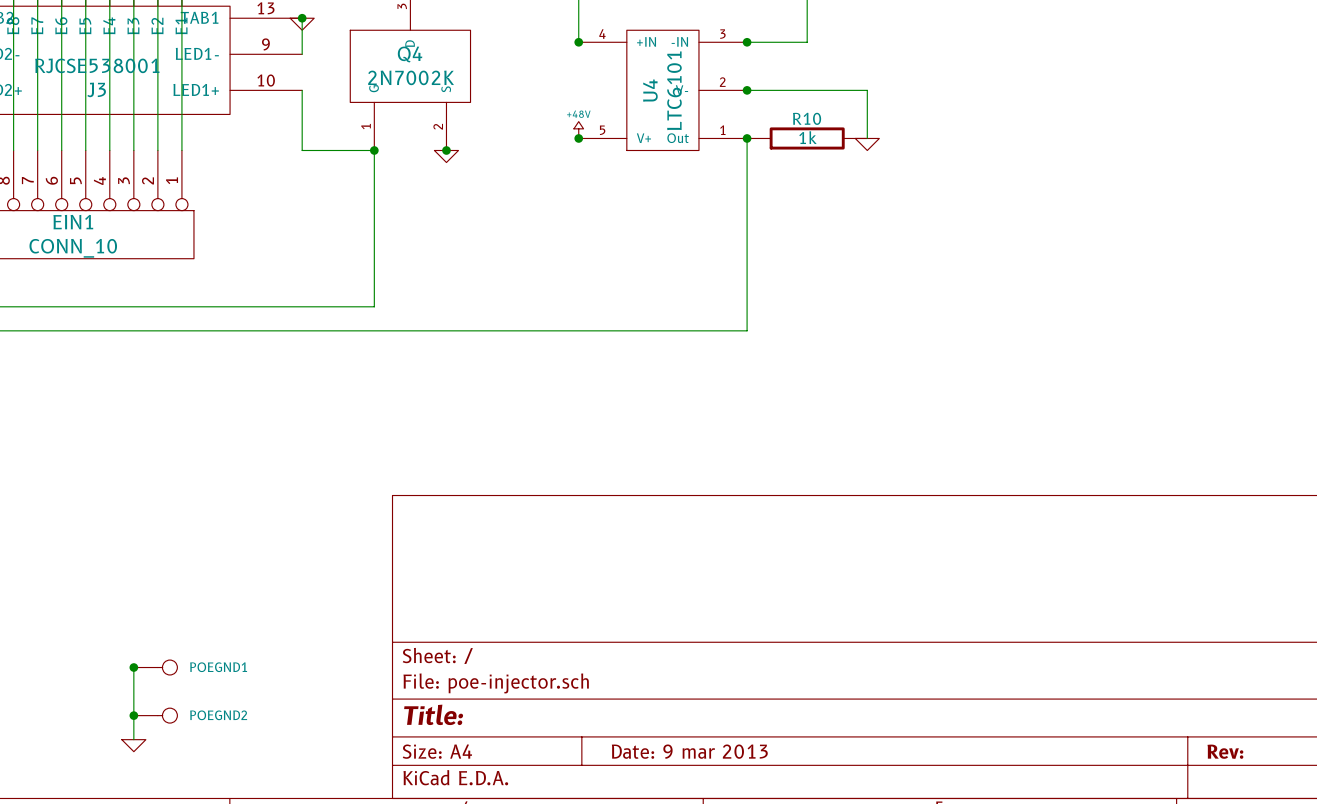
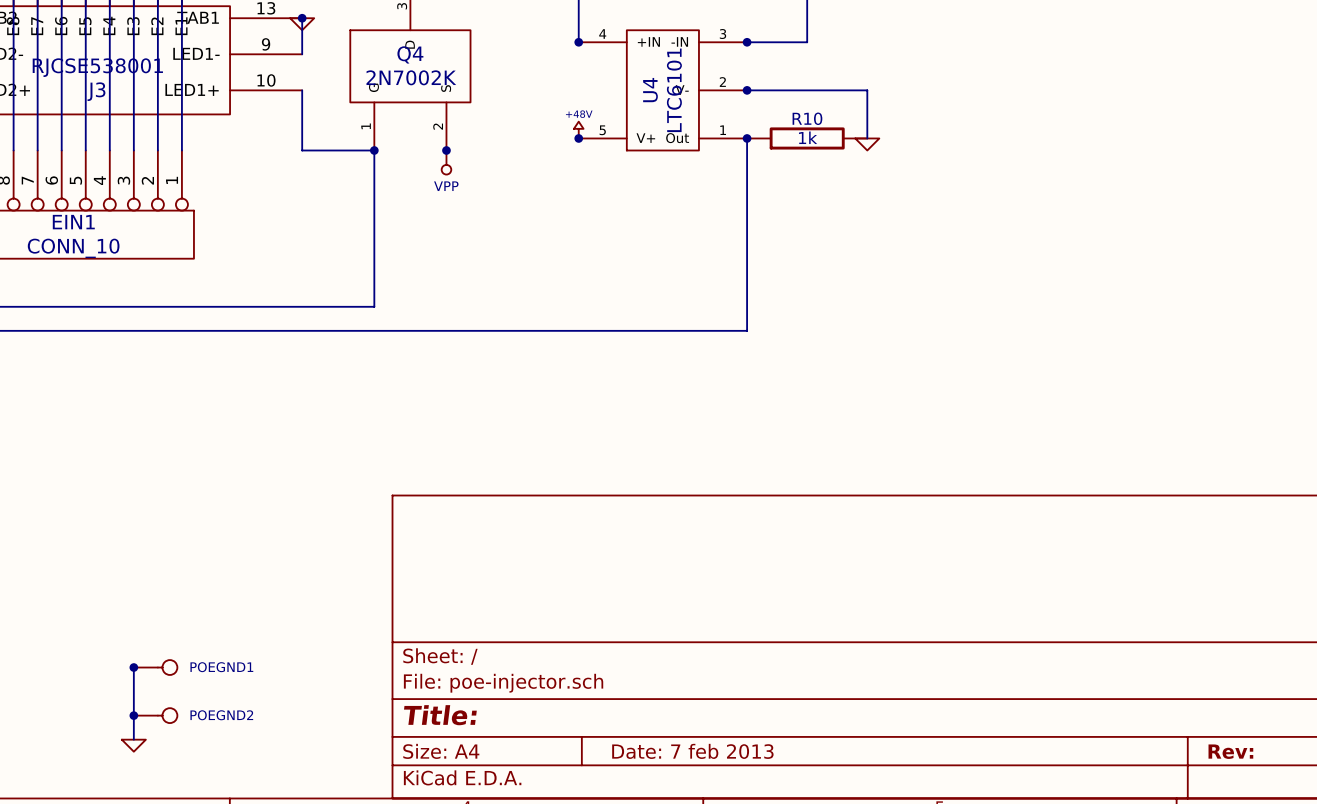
power symbol shape: [434, 150, 459, 163] -> [441, 150, 452, 175]
power symbol text: none -> VPP (446, 186)
title block: Date: 9 mar 2013 (689, 751) -> Date: 7 feb 2013 (692, 751)

